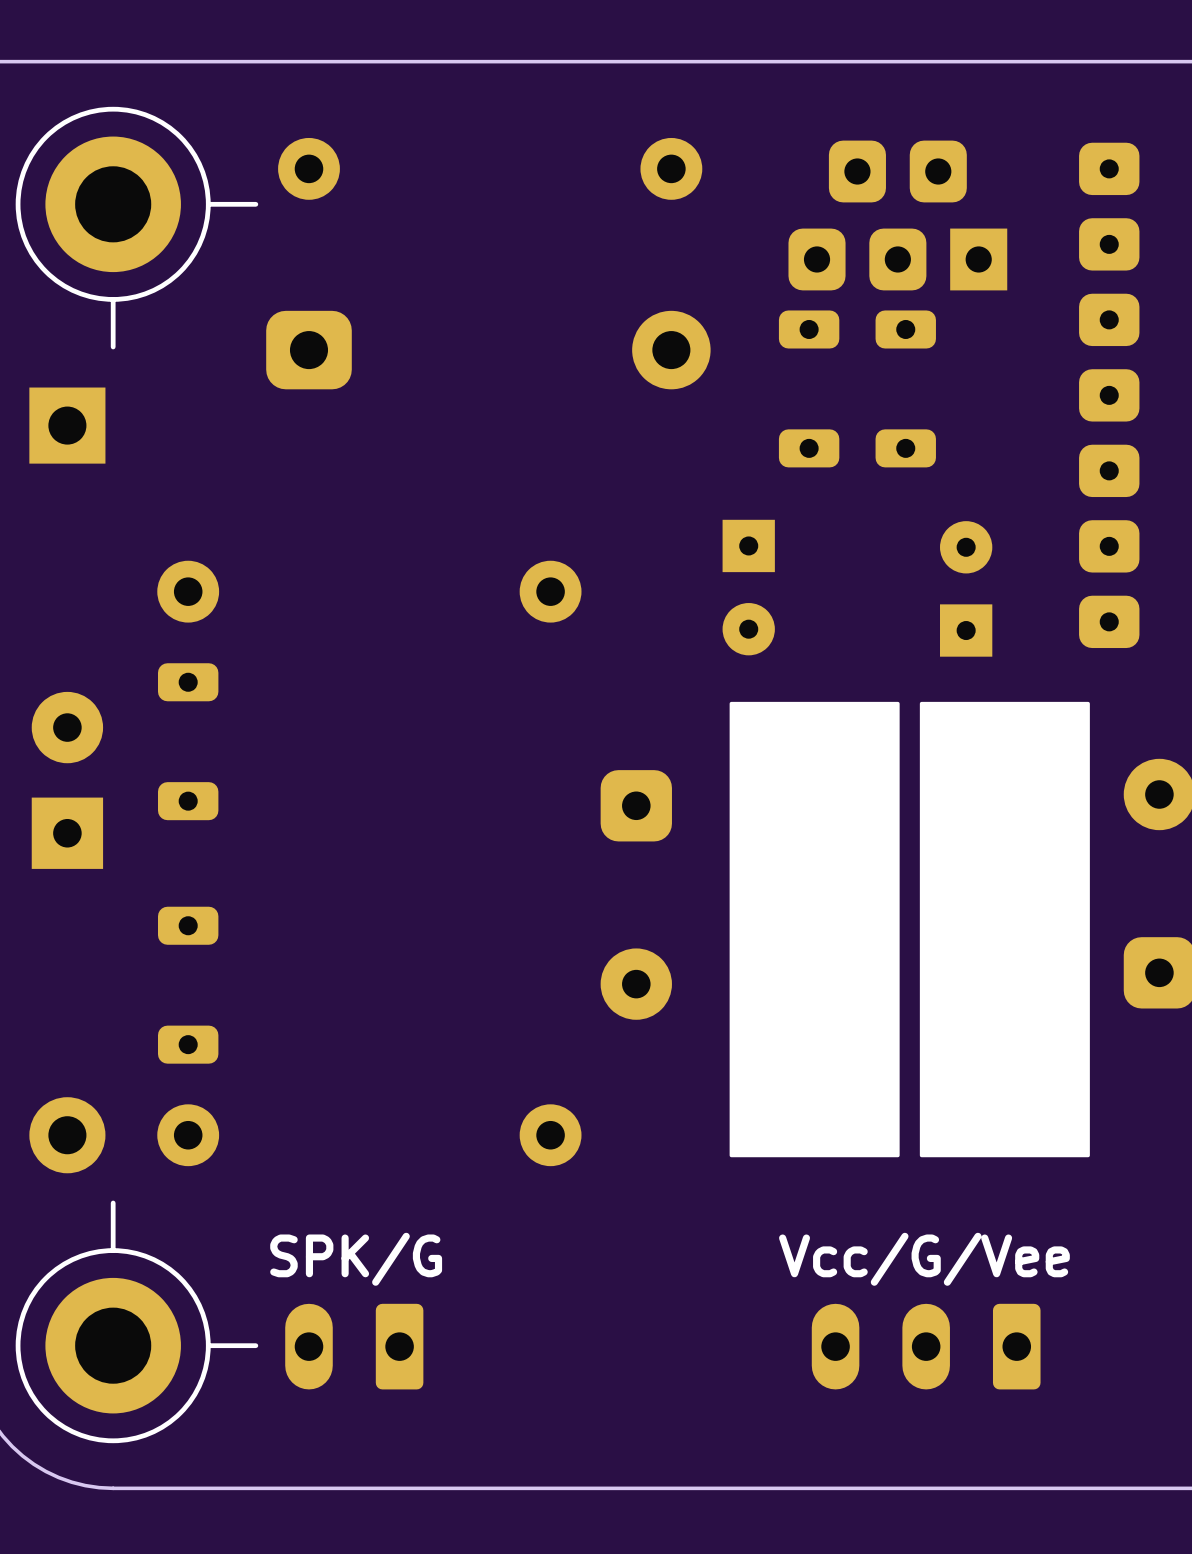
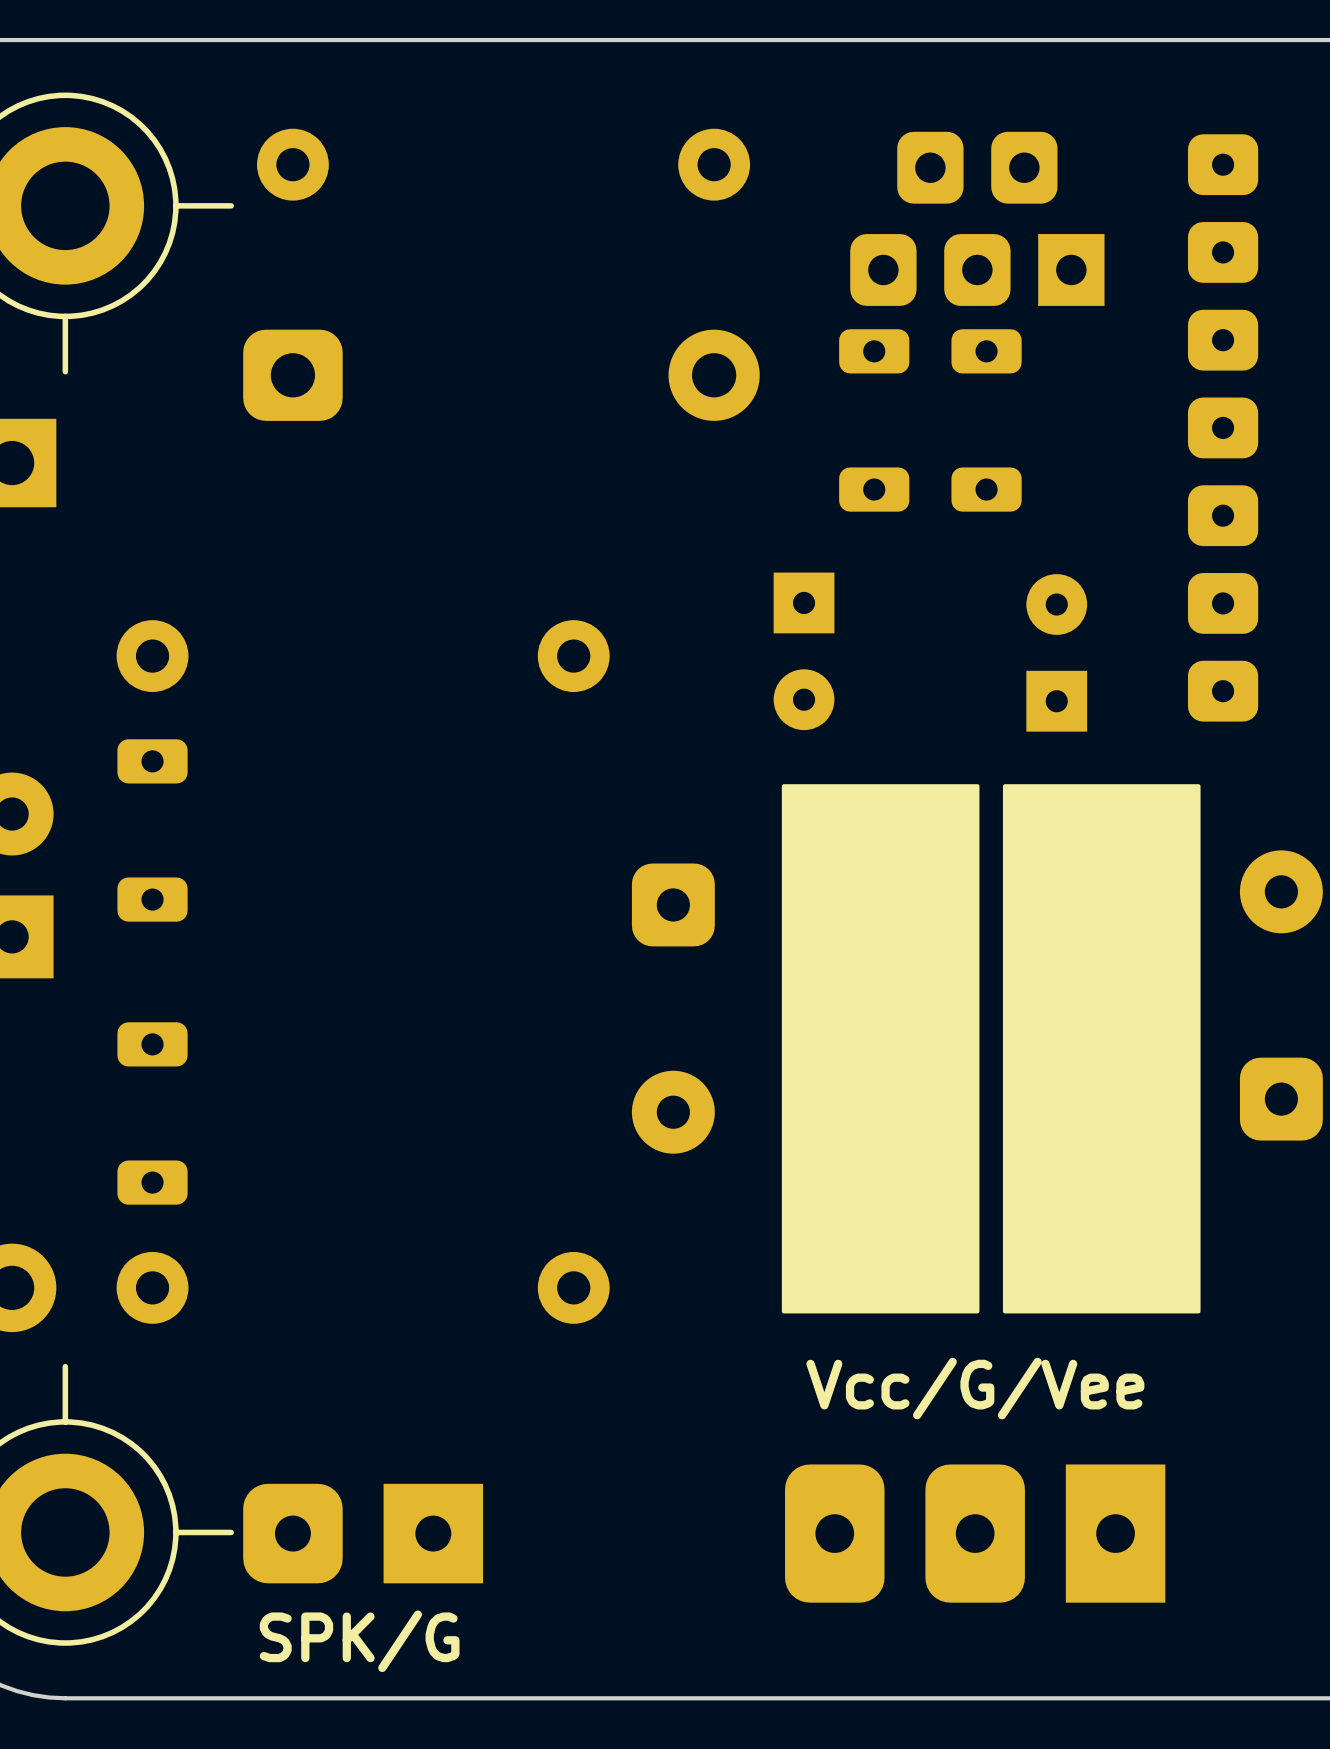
text position: SPK/G (356, 1259) -> SPK/G (359, 1641)
text position: Vcc/G/Vee (924, 1259) -> Vcc/G/Vee (975, 1388)
part footprint: [285, 1303, 424, 1390] -> [243, 1483, 484, 1584]
part: none -> (975, 1533)
part: (926, 1346) -> none

